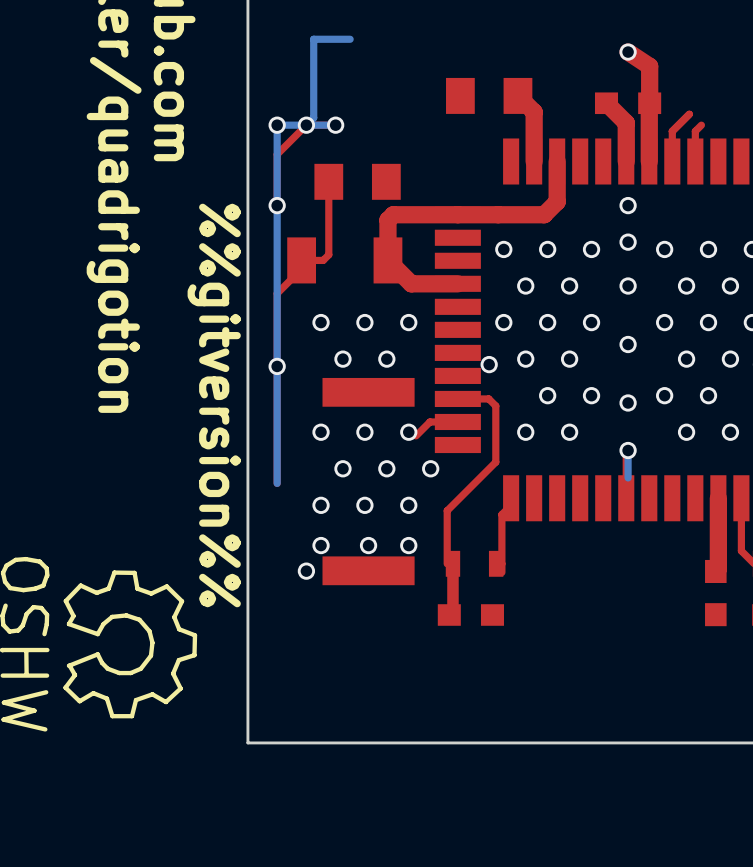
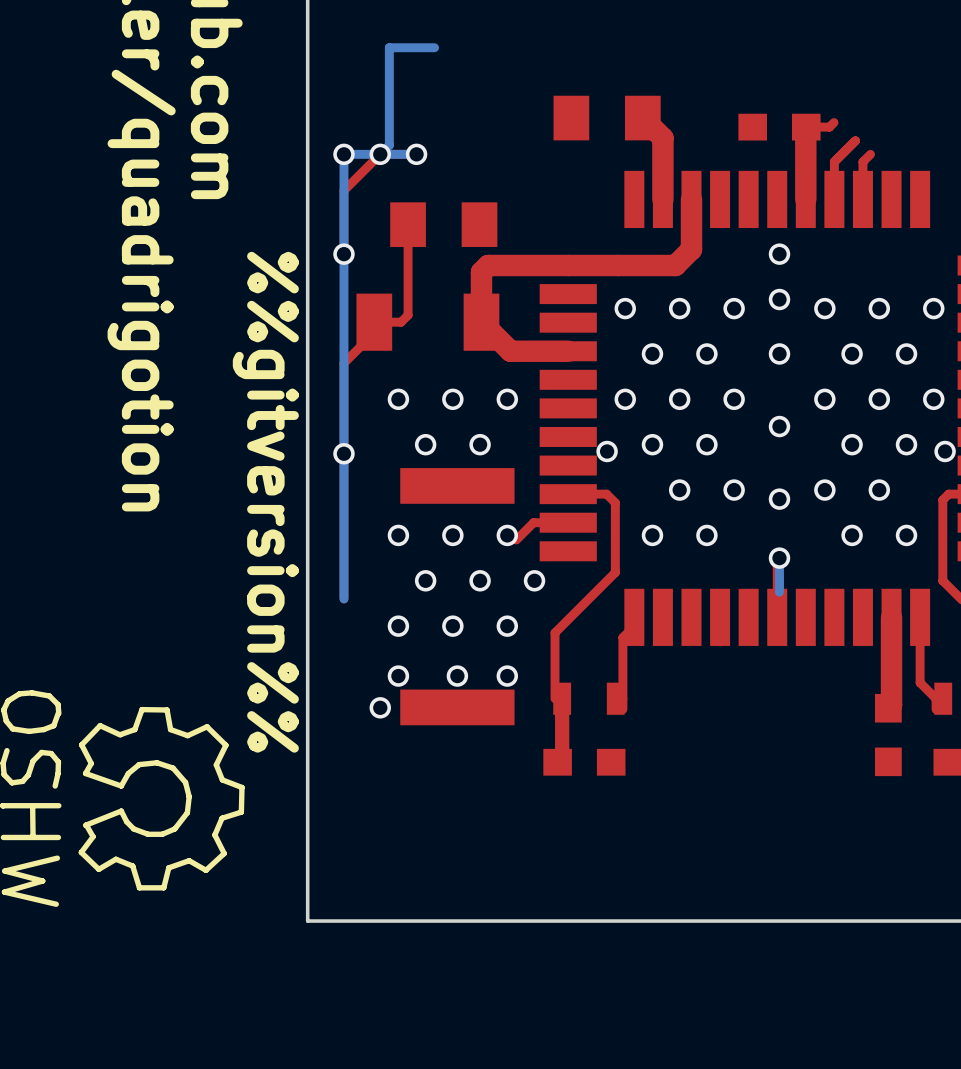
top track: (628, 52) (649, 66) (649, 103) -> (834, 122) (829, 127) (806, 127)
via: (628, 52) -> none
top track: (606, 103) (626, 123) (626, 161) -> none

